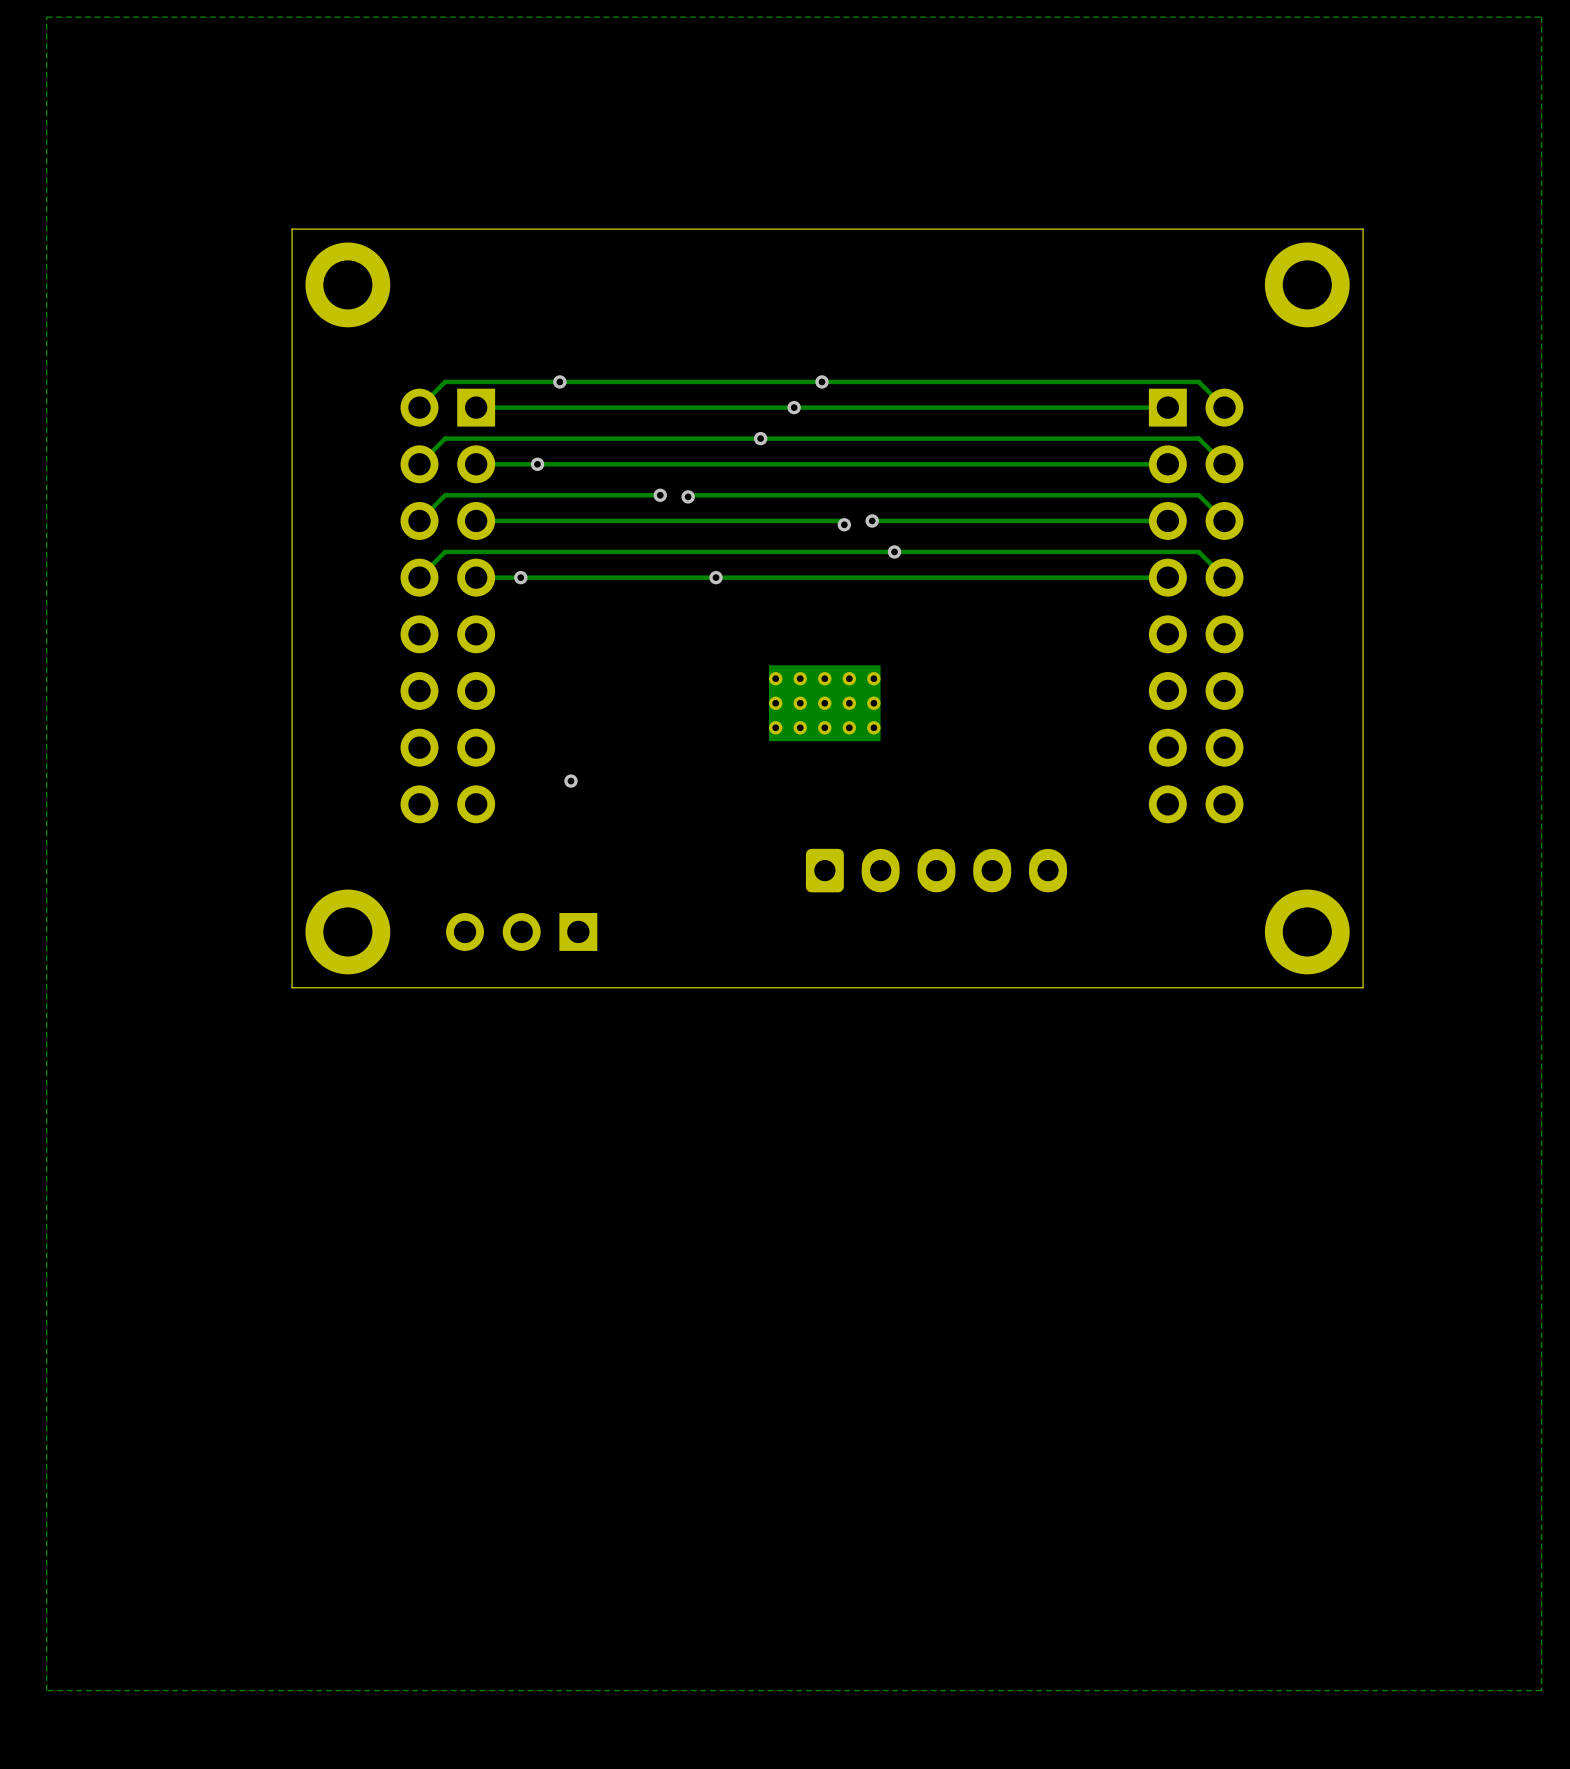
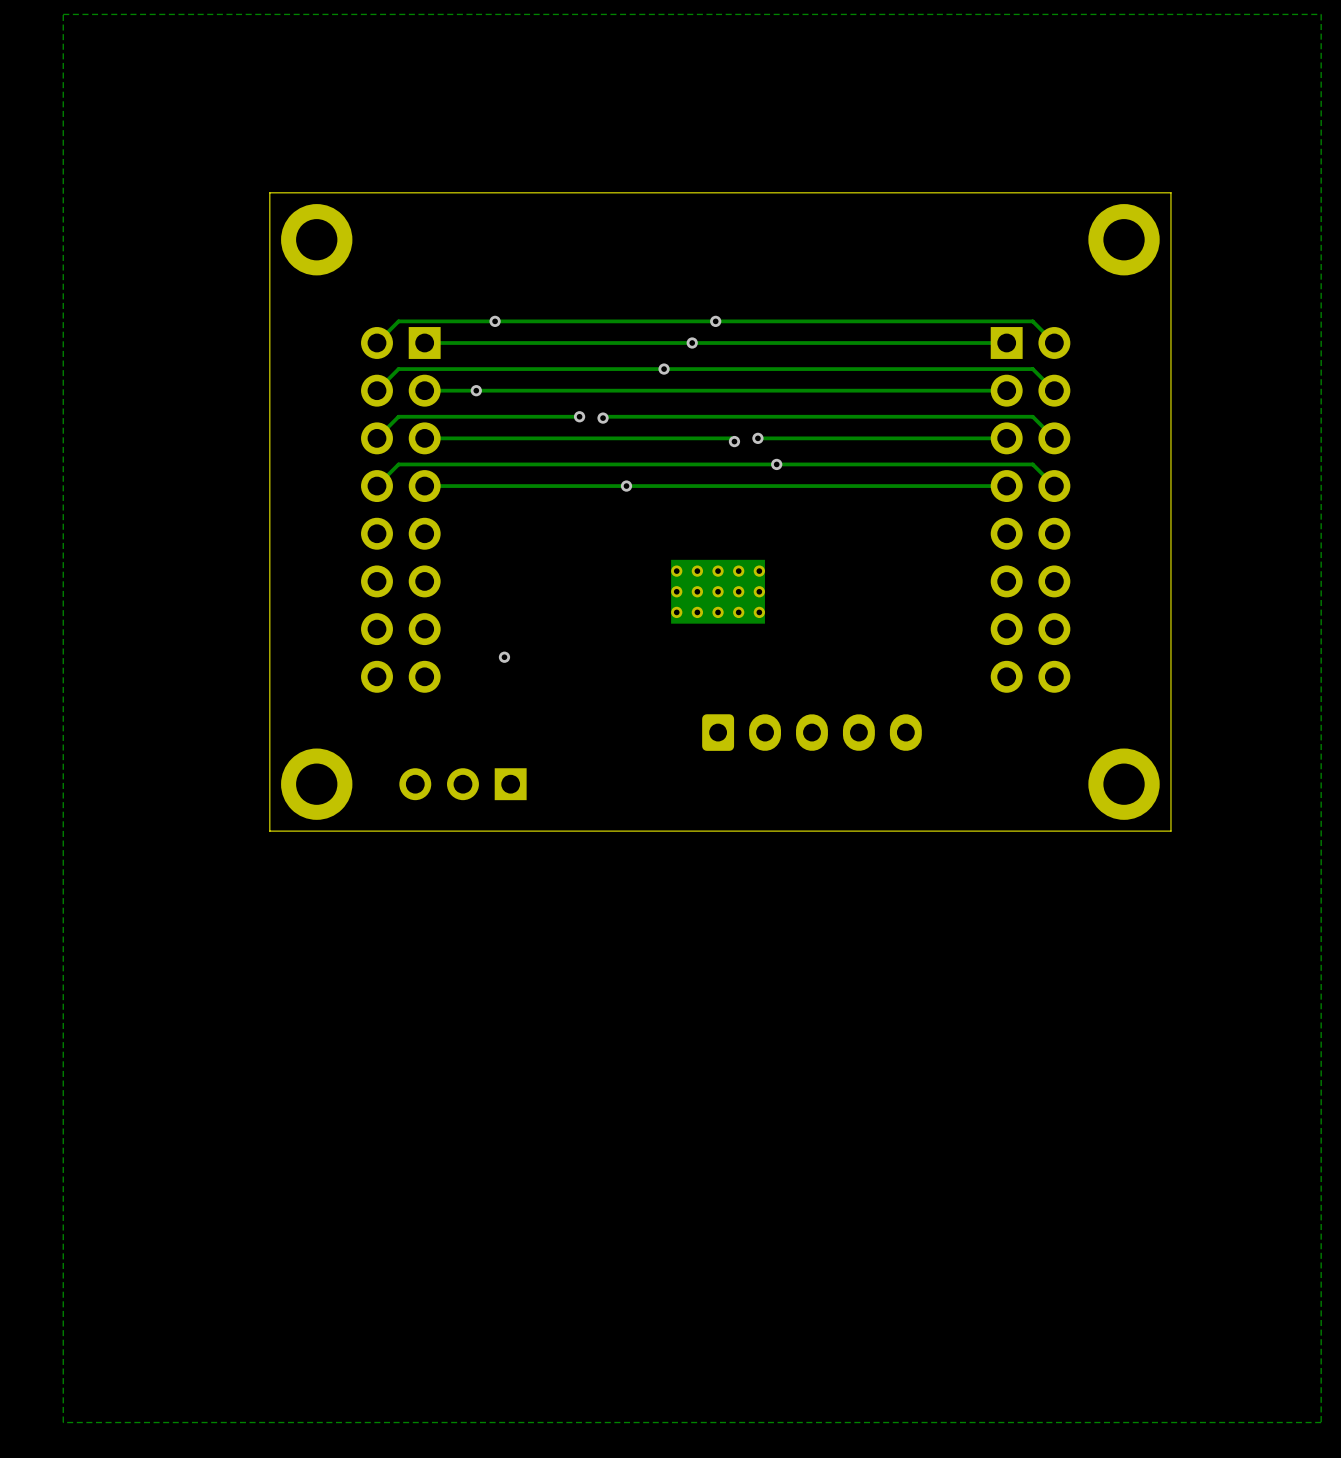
via: (520, 577) -> none

